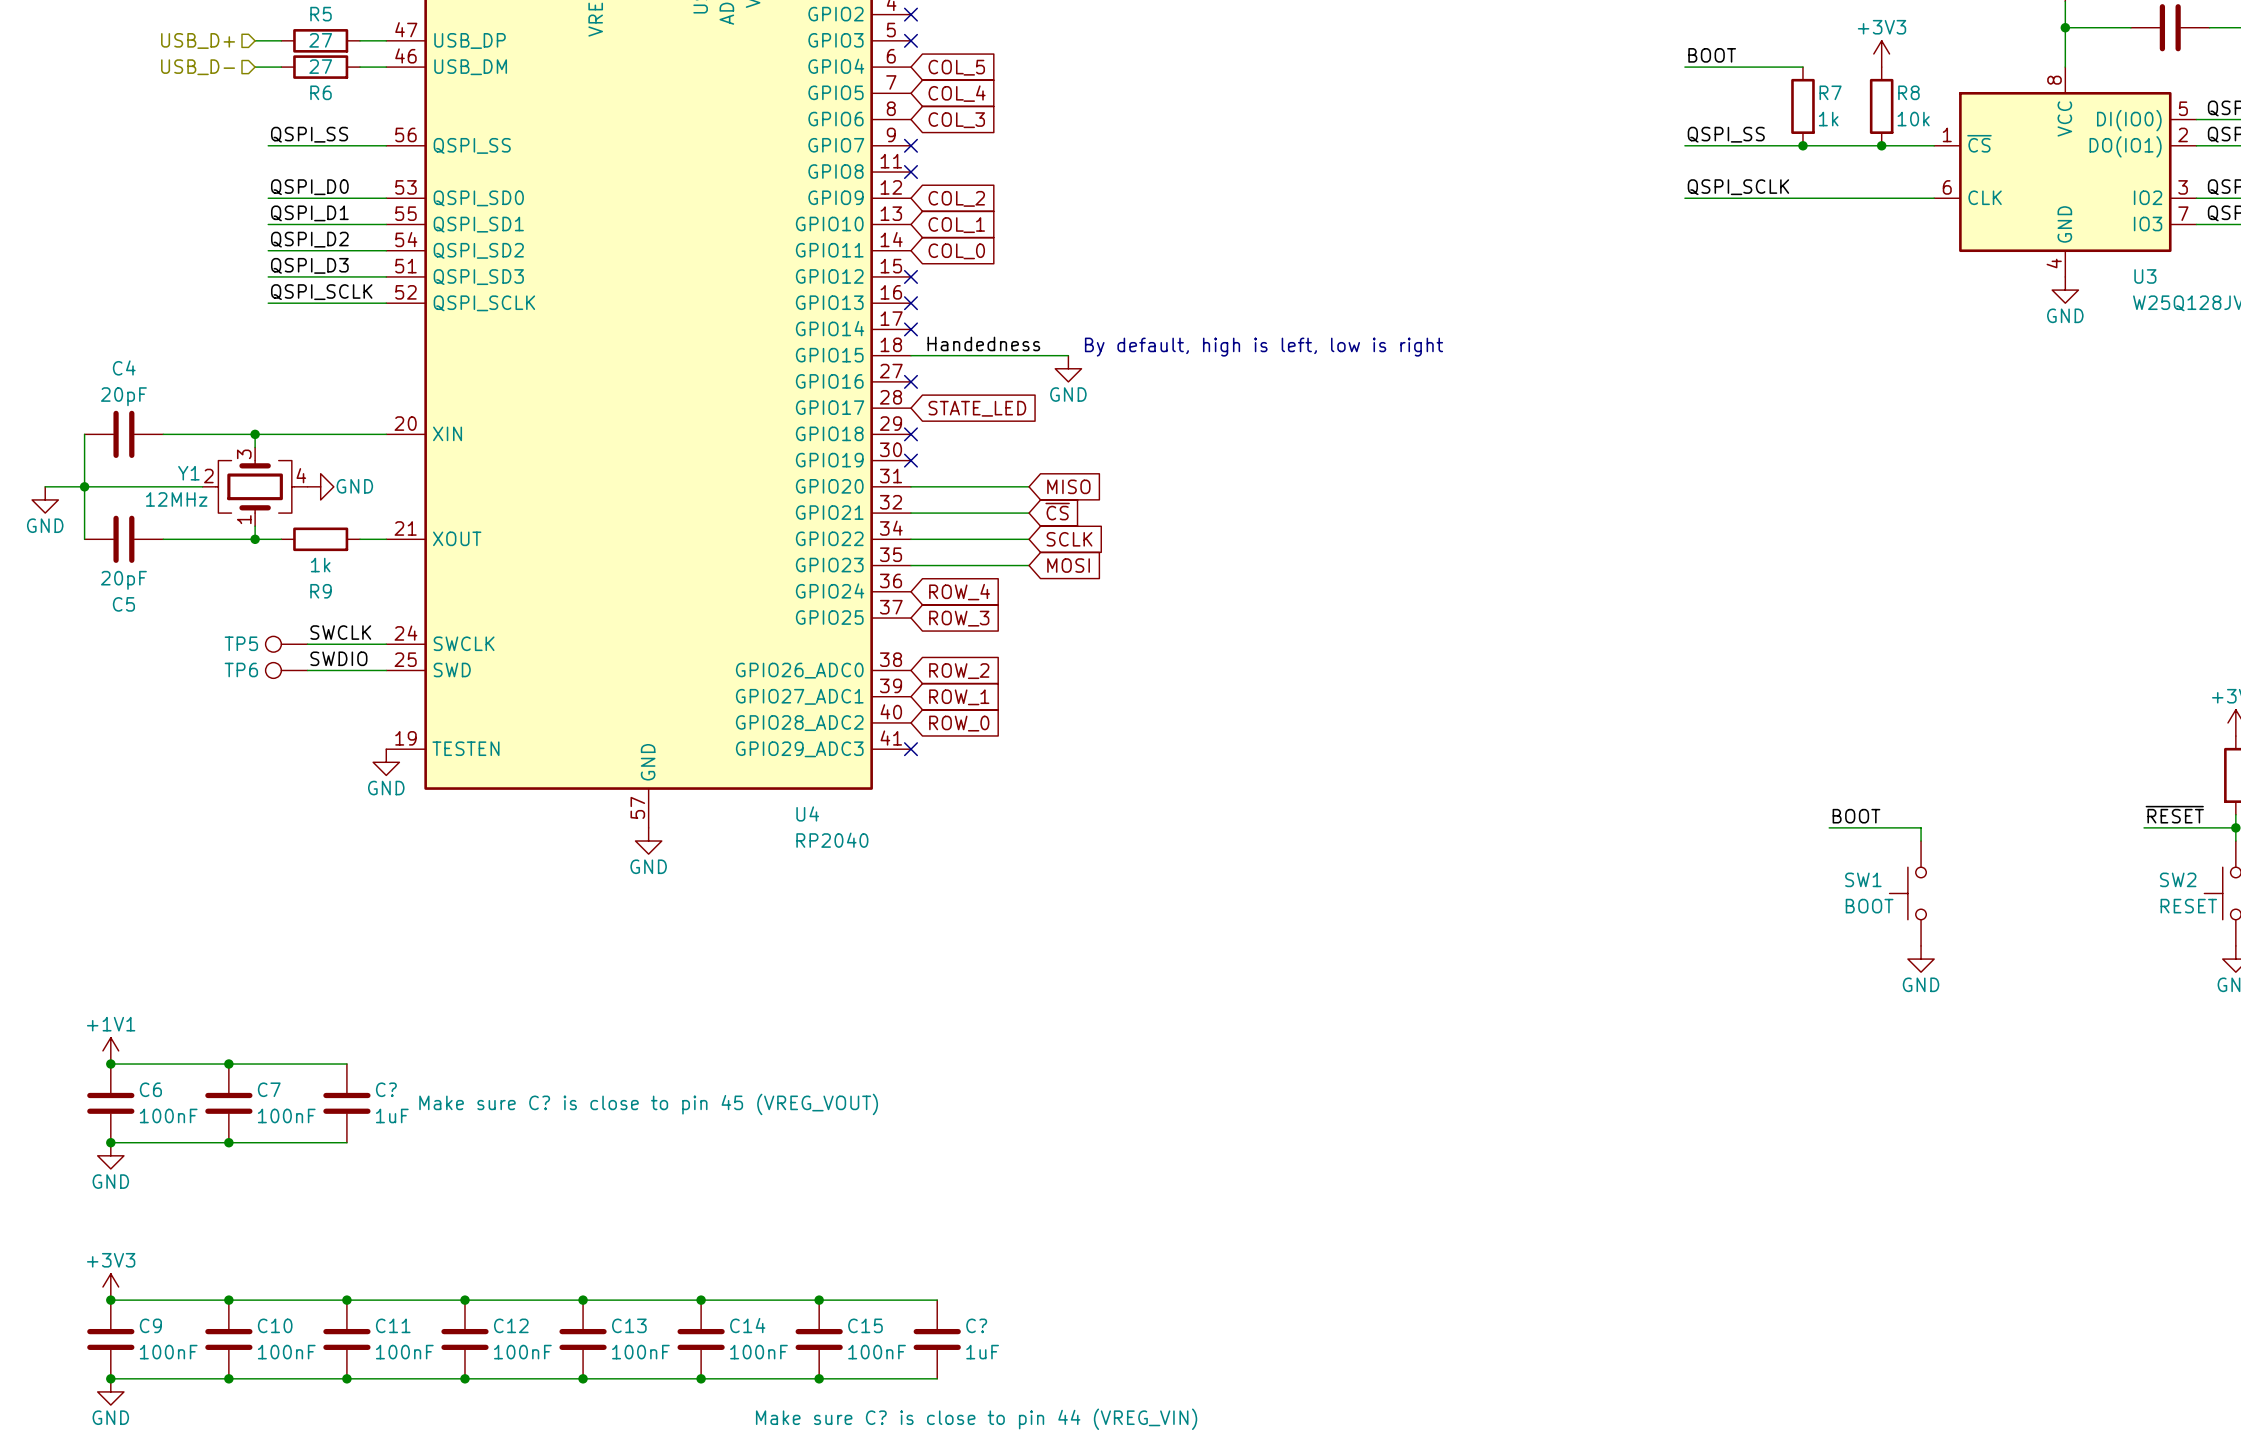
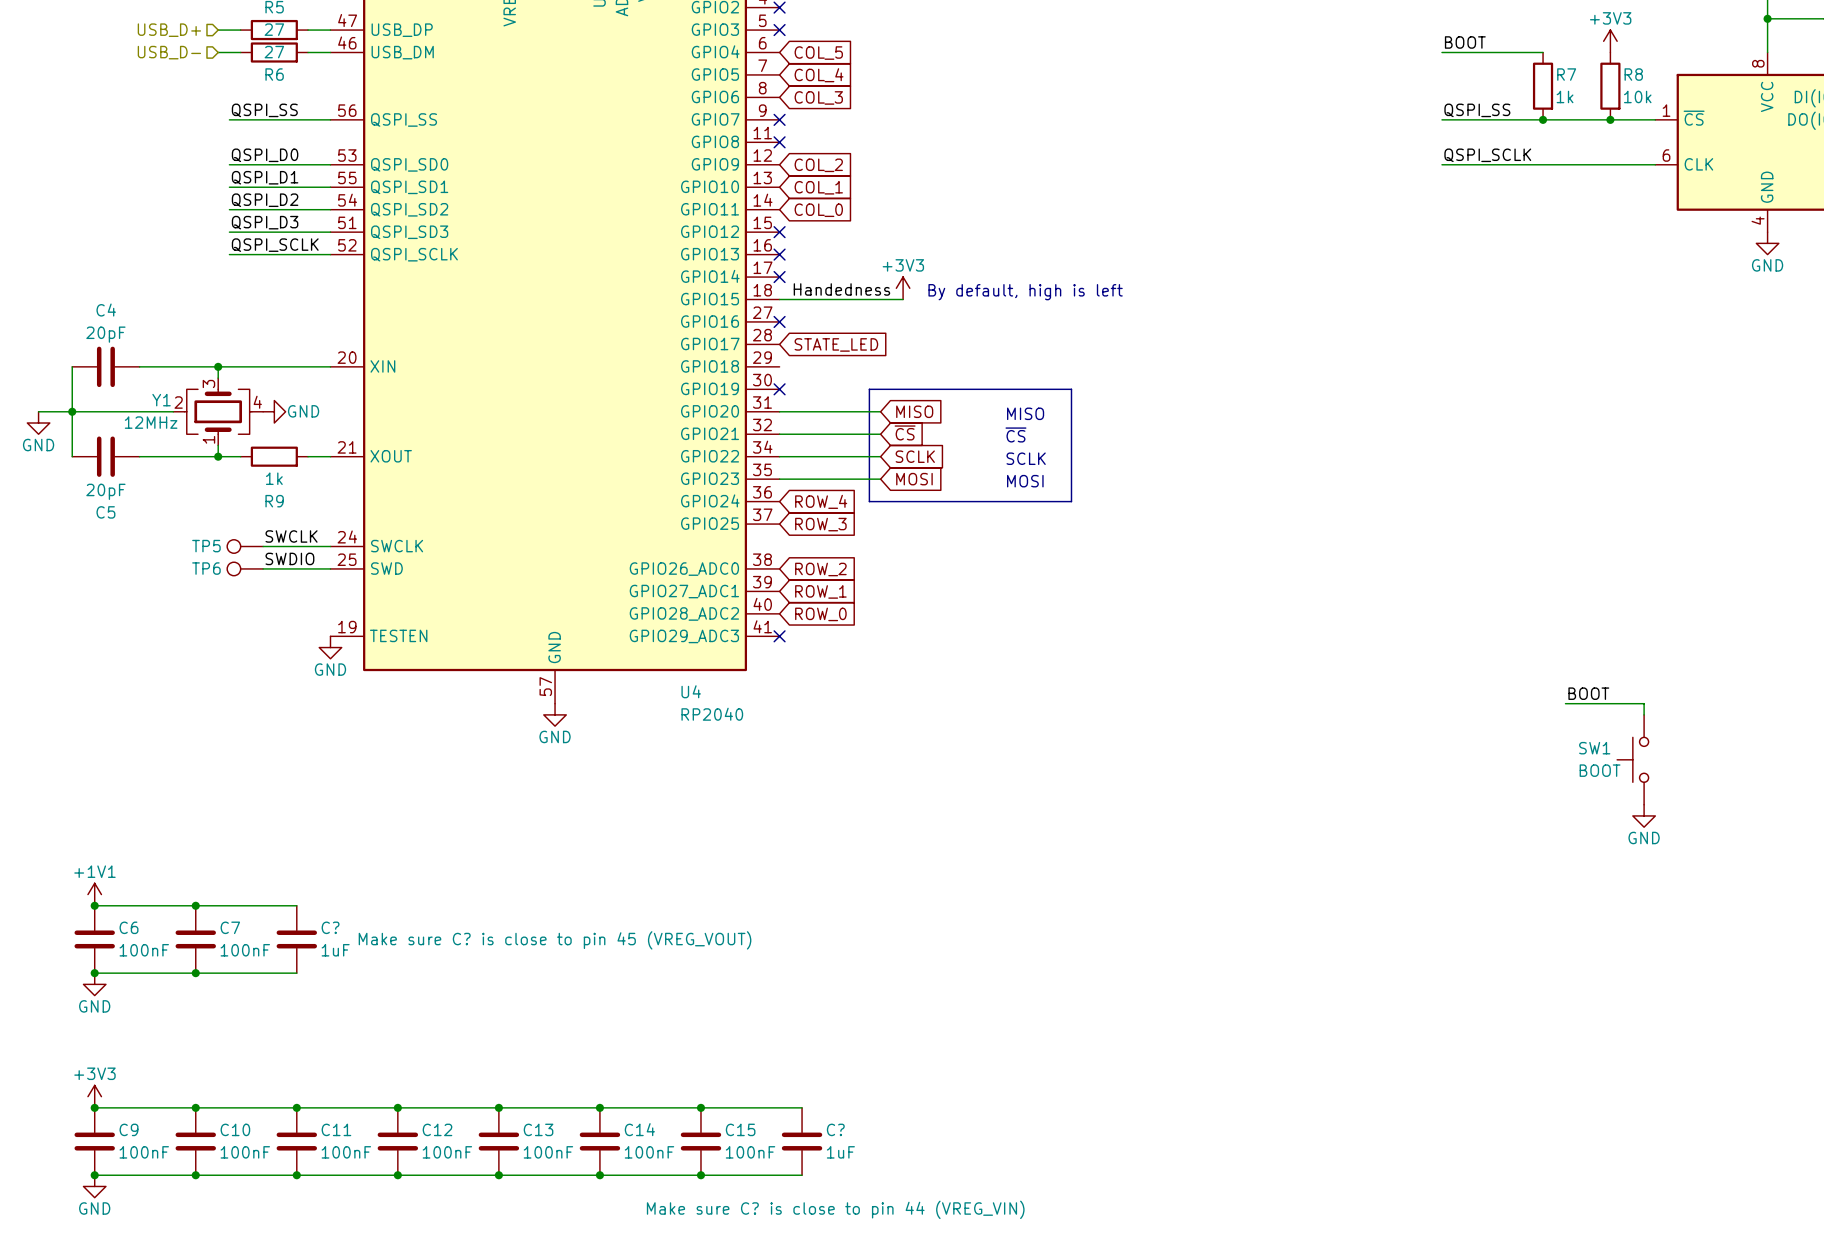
power symbol: none -> +3V3 (903, 288)
text: By default, high is left, low is right (1264, 347) -> By default, high is left (1025, 292)
wire: (1055, 355) (1068, 355) -> none
power symbol: GND (1068, 368) -> none
no-connect mark: (910, 434) -> none
line: none -> (869, 389) (869, 501) (1071, 501) (1071, 389) (869, 389)
text: none -> MISO (1025, 413)
text: none -> ~{CS} (1015, 434)
text: none -> SCLK (1026, 458)
text: none -> MOSI (1025, 481)

